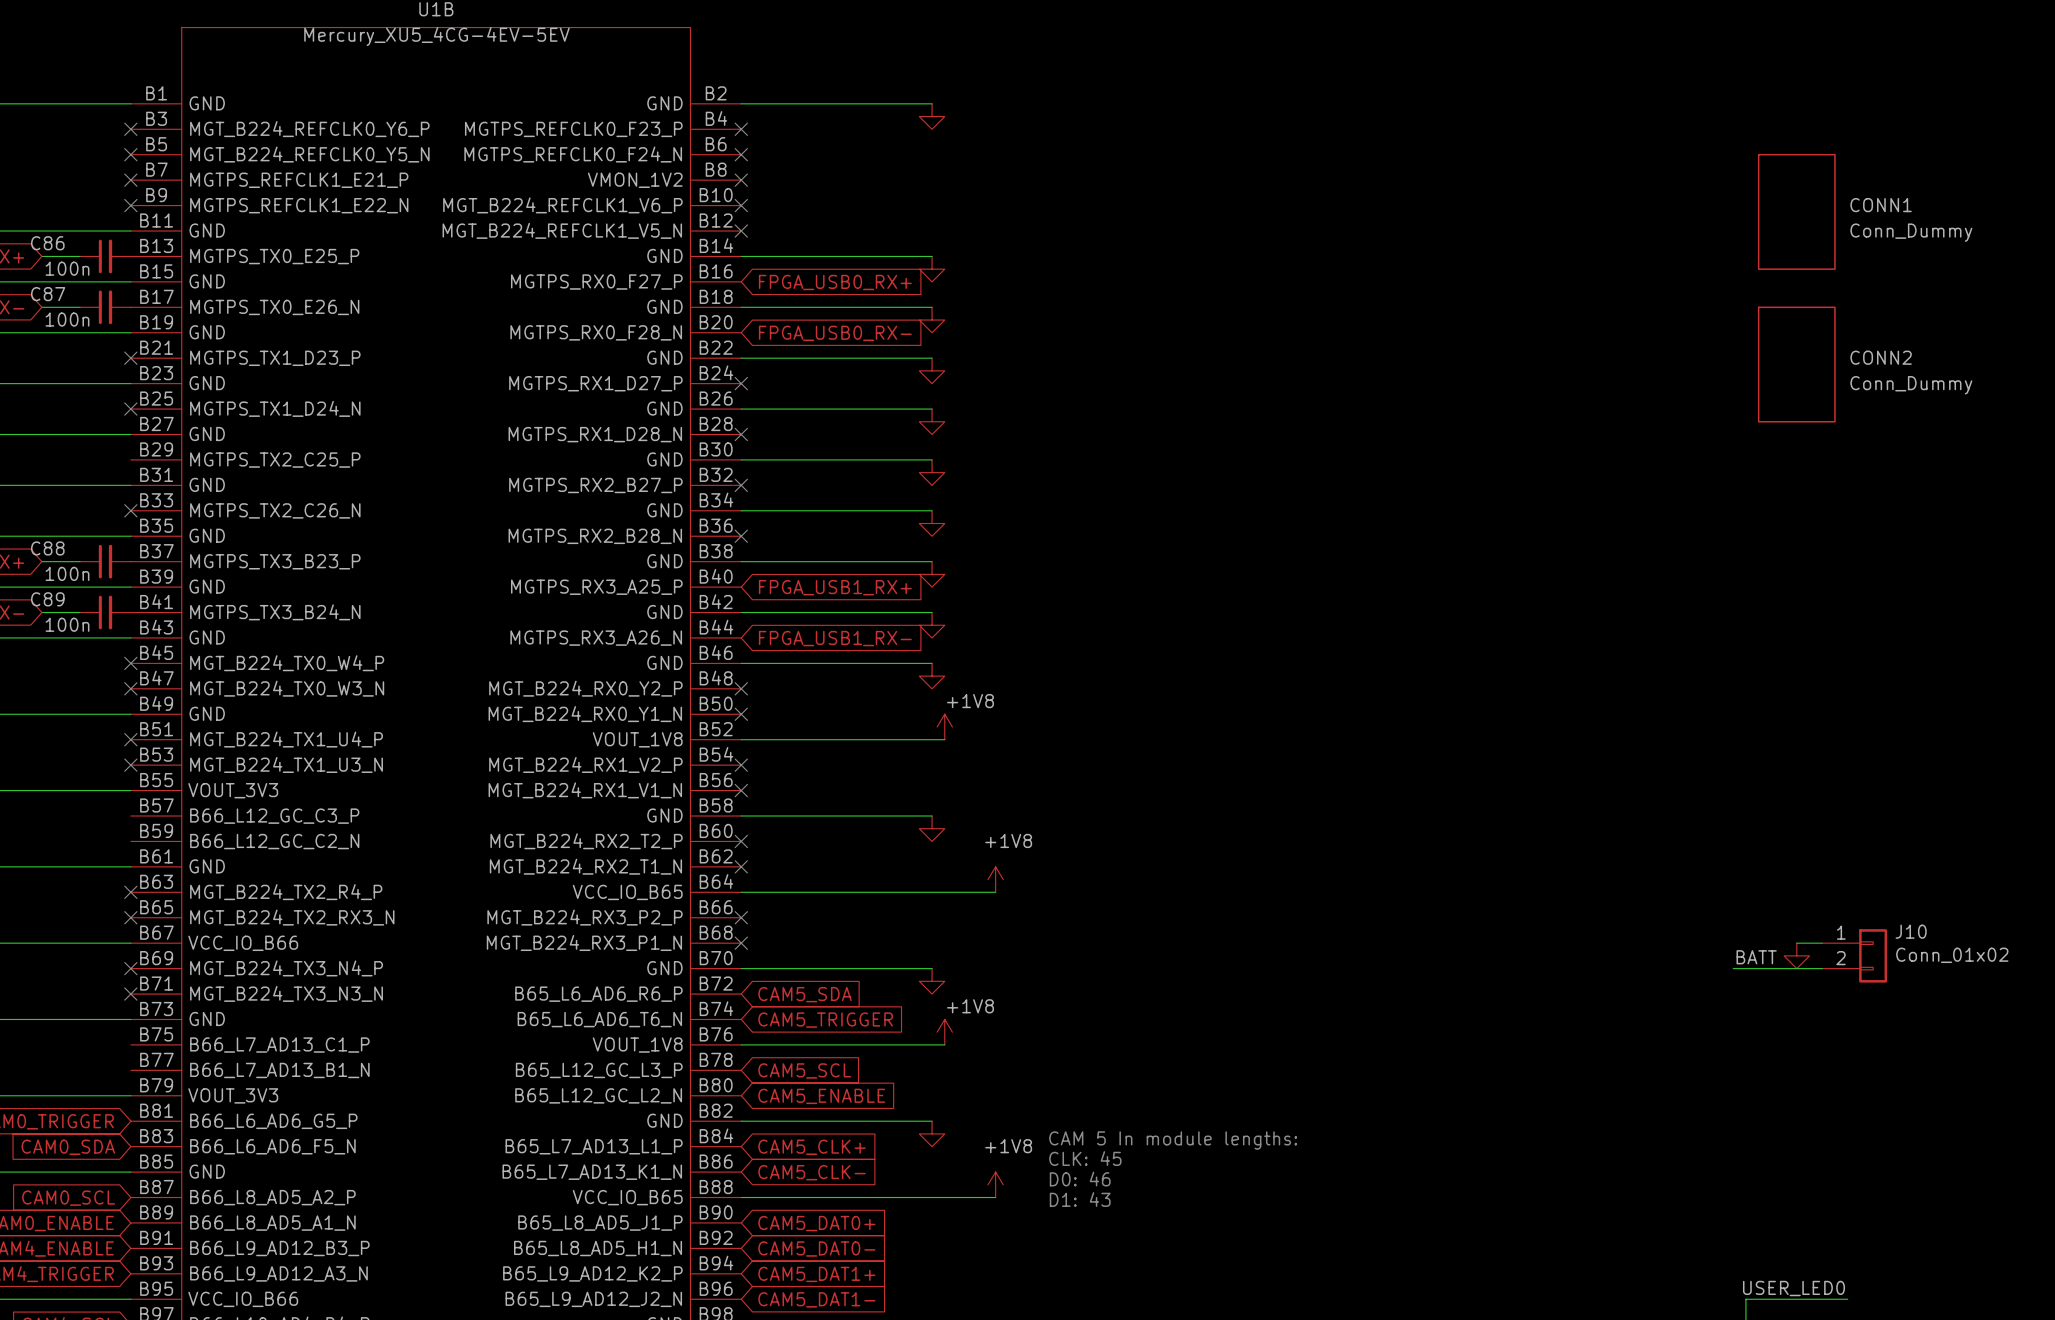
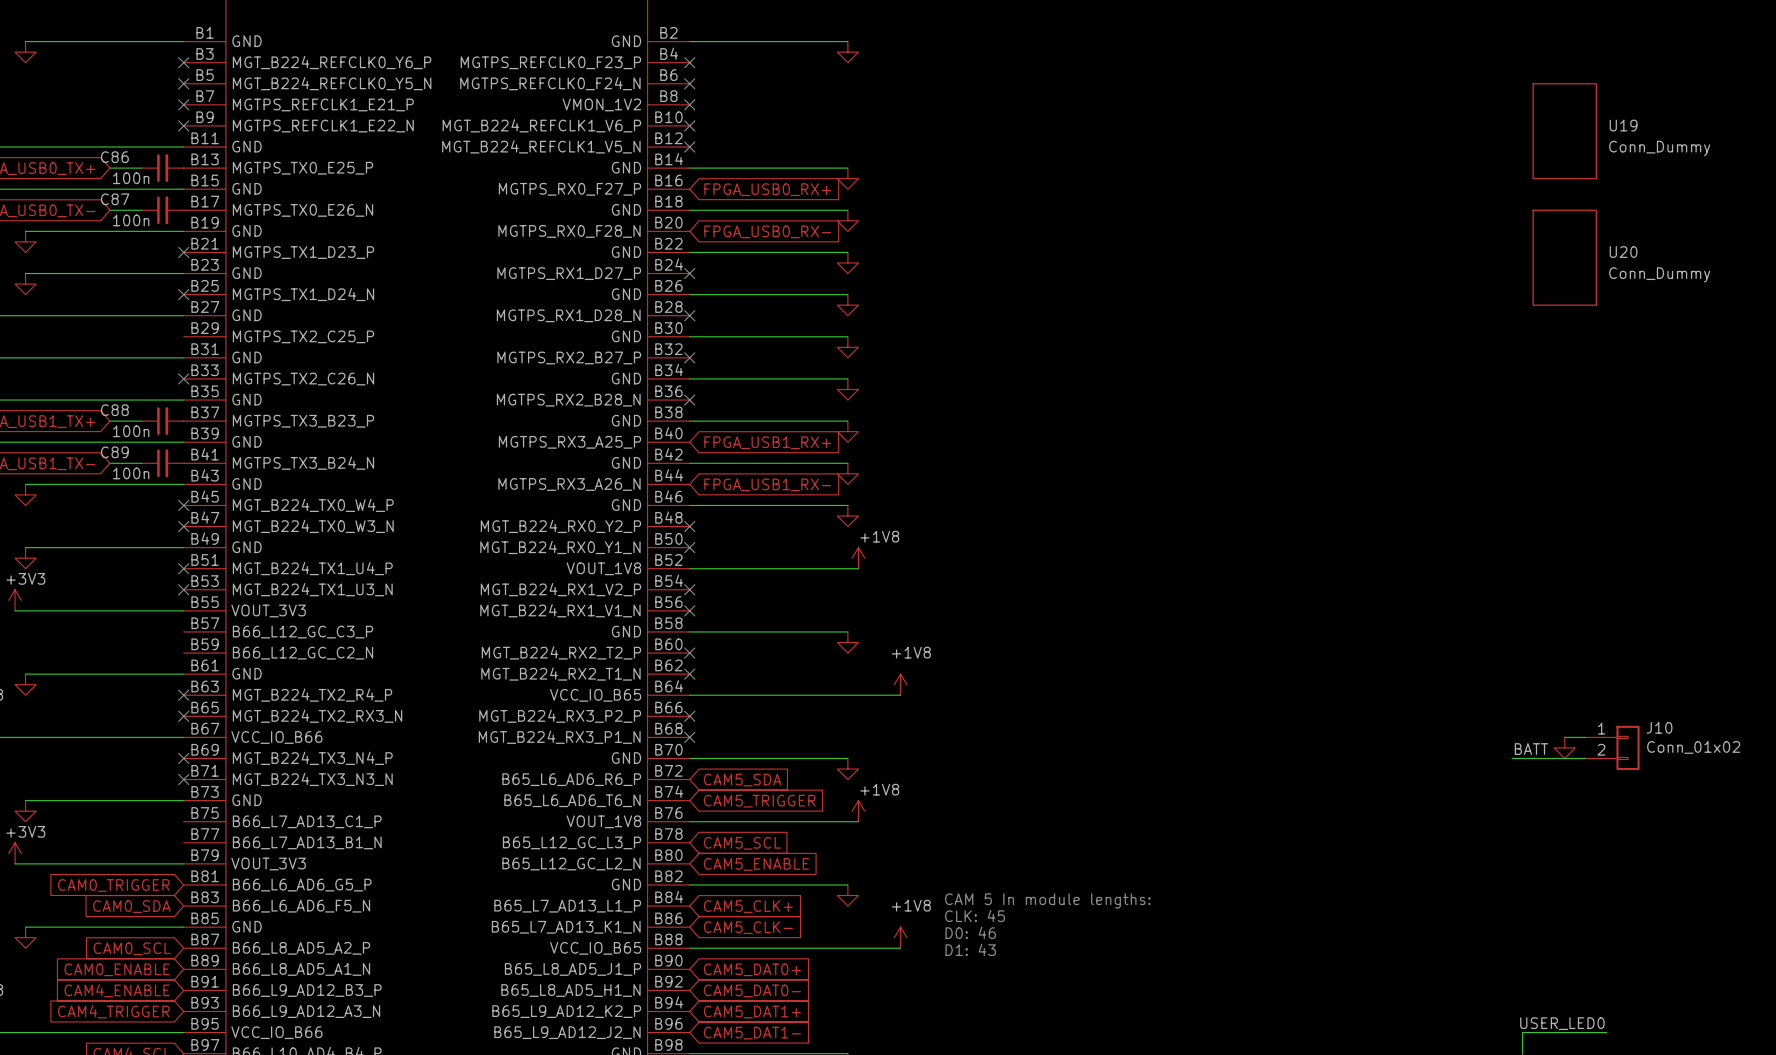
CONN1 name: CONN1 (1881, 205) -> U19 (1623, 125)
CONN2 name: CONN2 (1881, 357) -> U20 (1623, 252)

